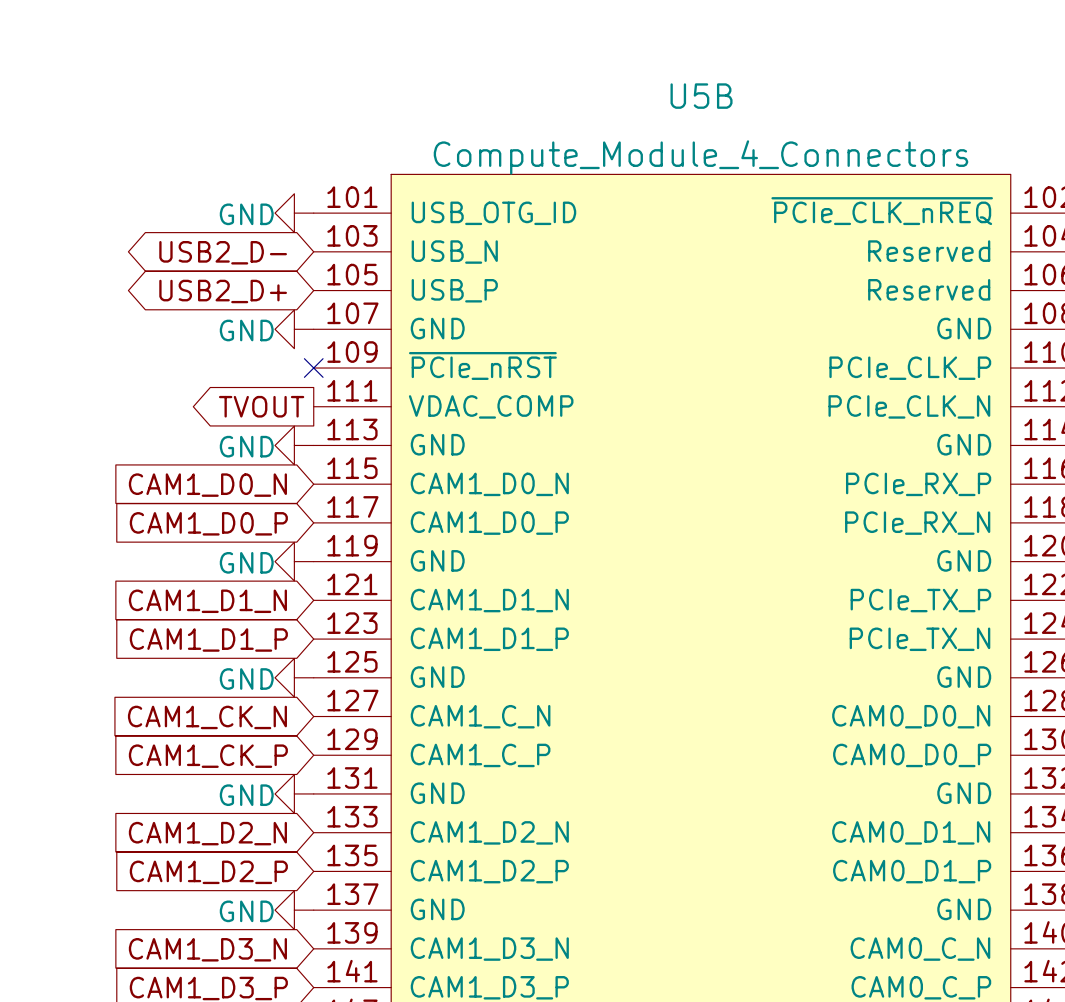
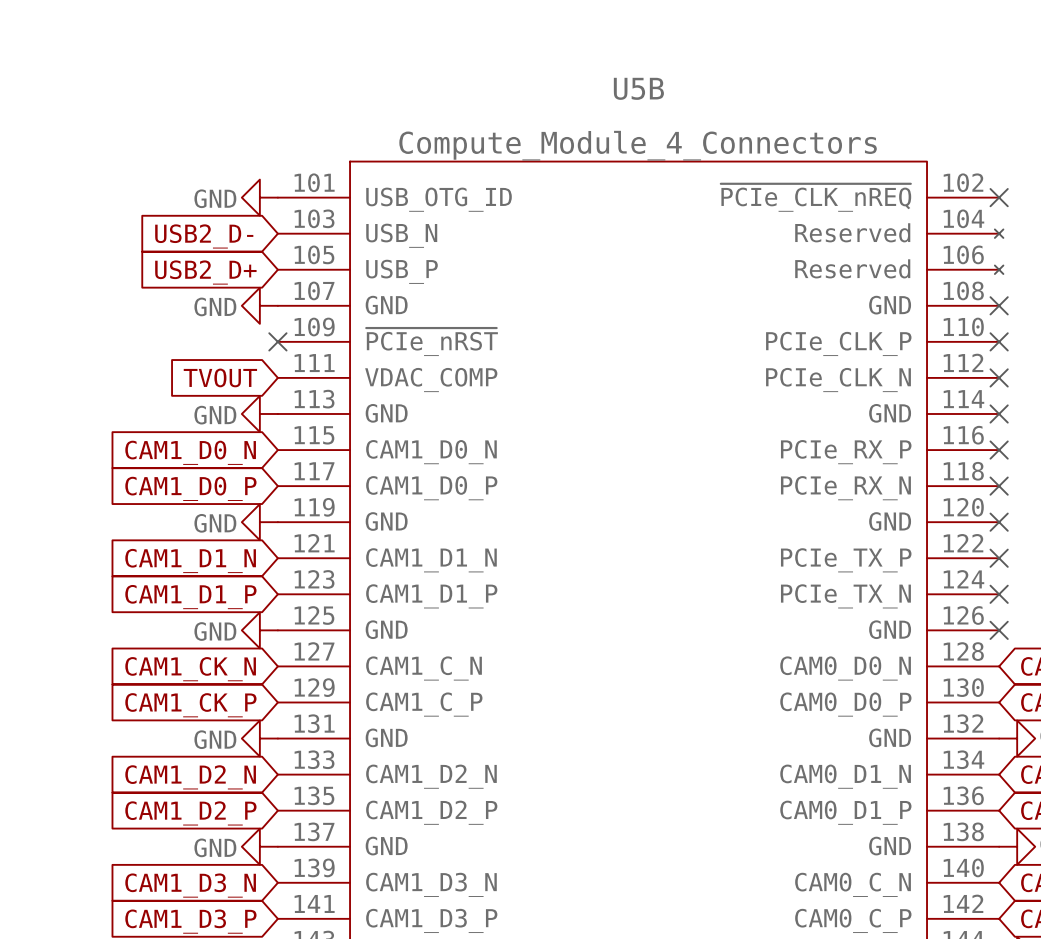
global label shape: bidirectional (223, 252) -> input (204, 236)
global label shape: bidirectional (223, 291) -> input (205, 272)
global label shape: output (261, 406) -> input (220, 377)

